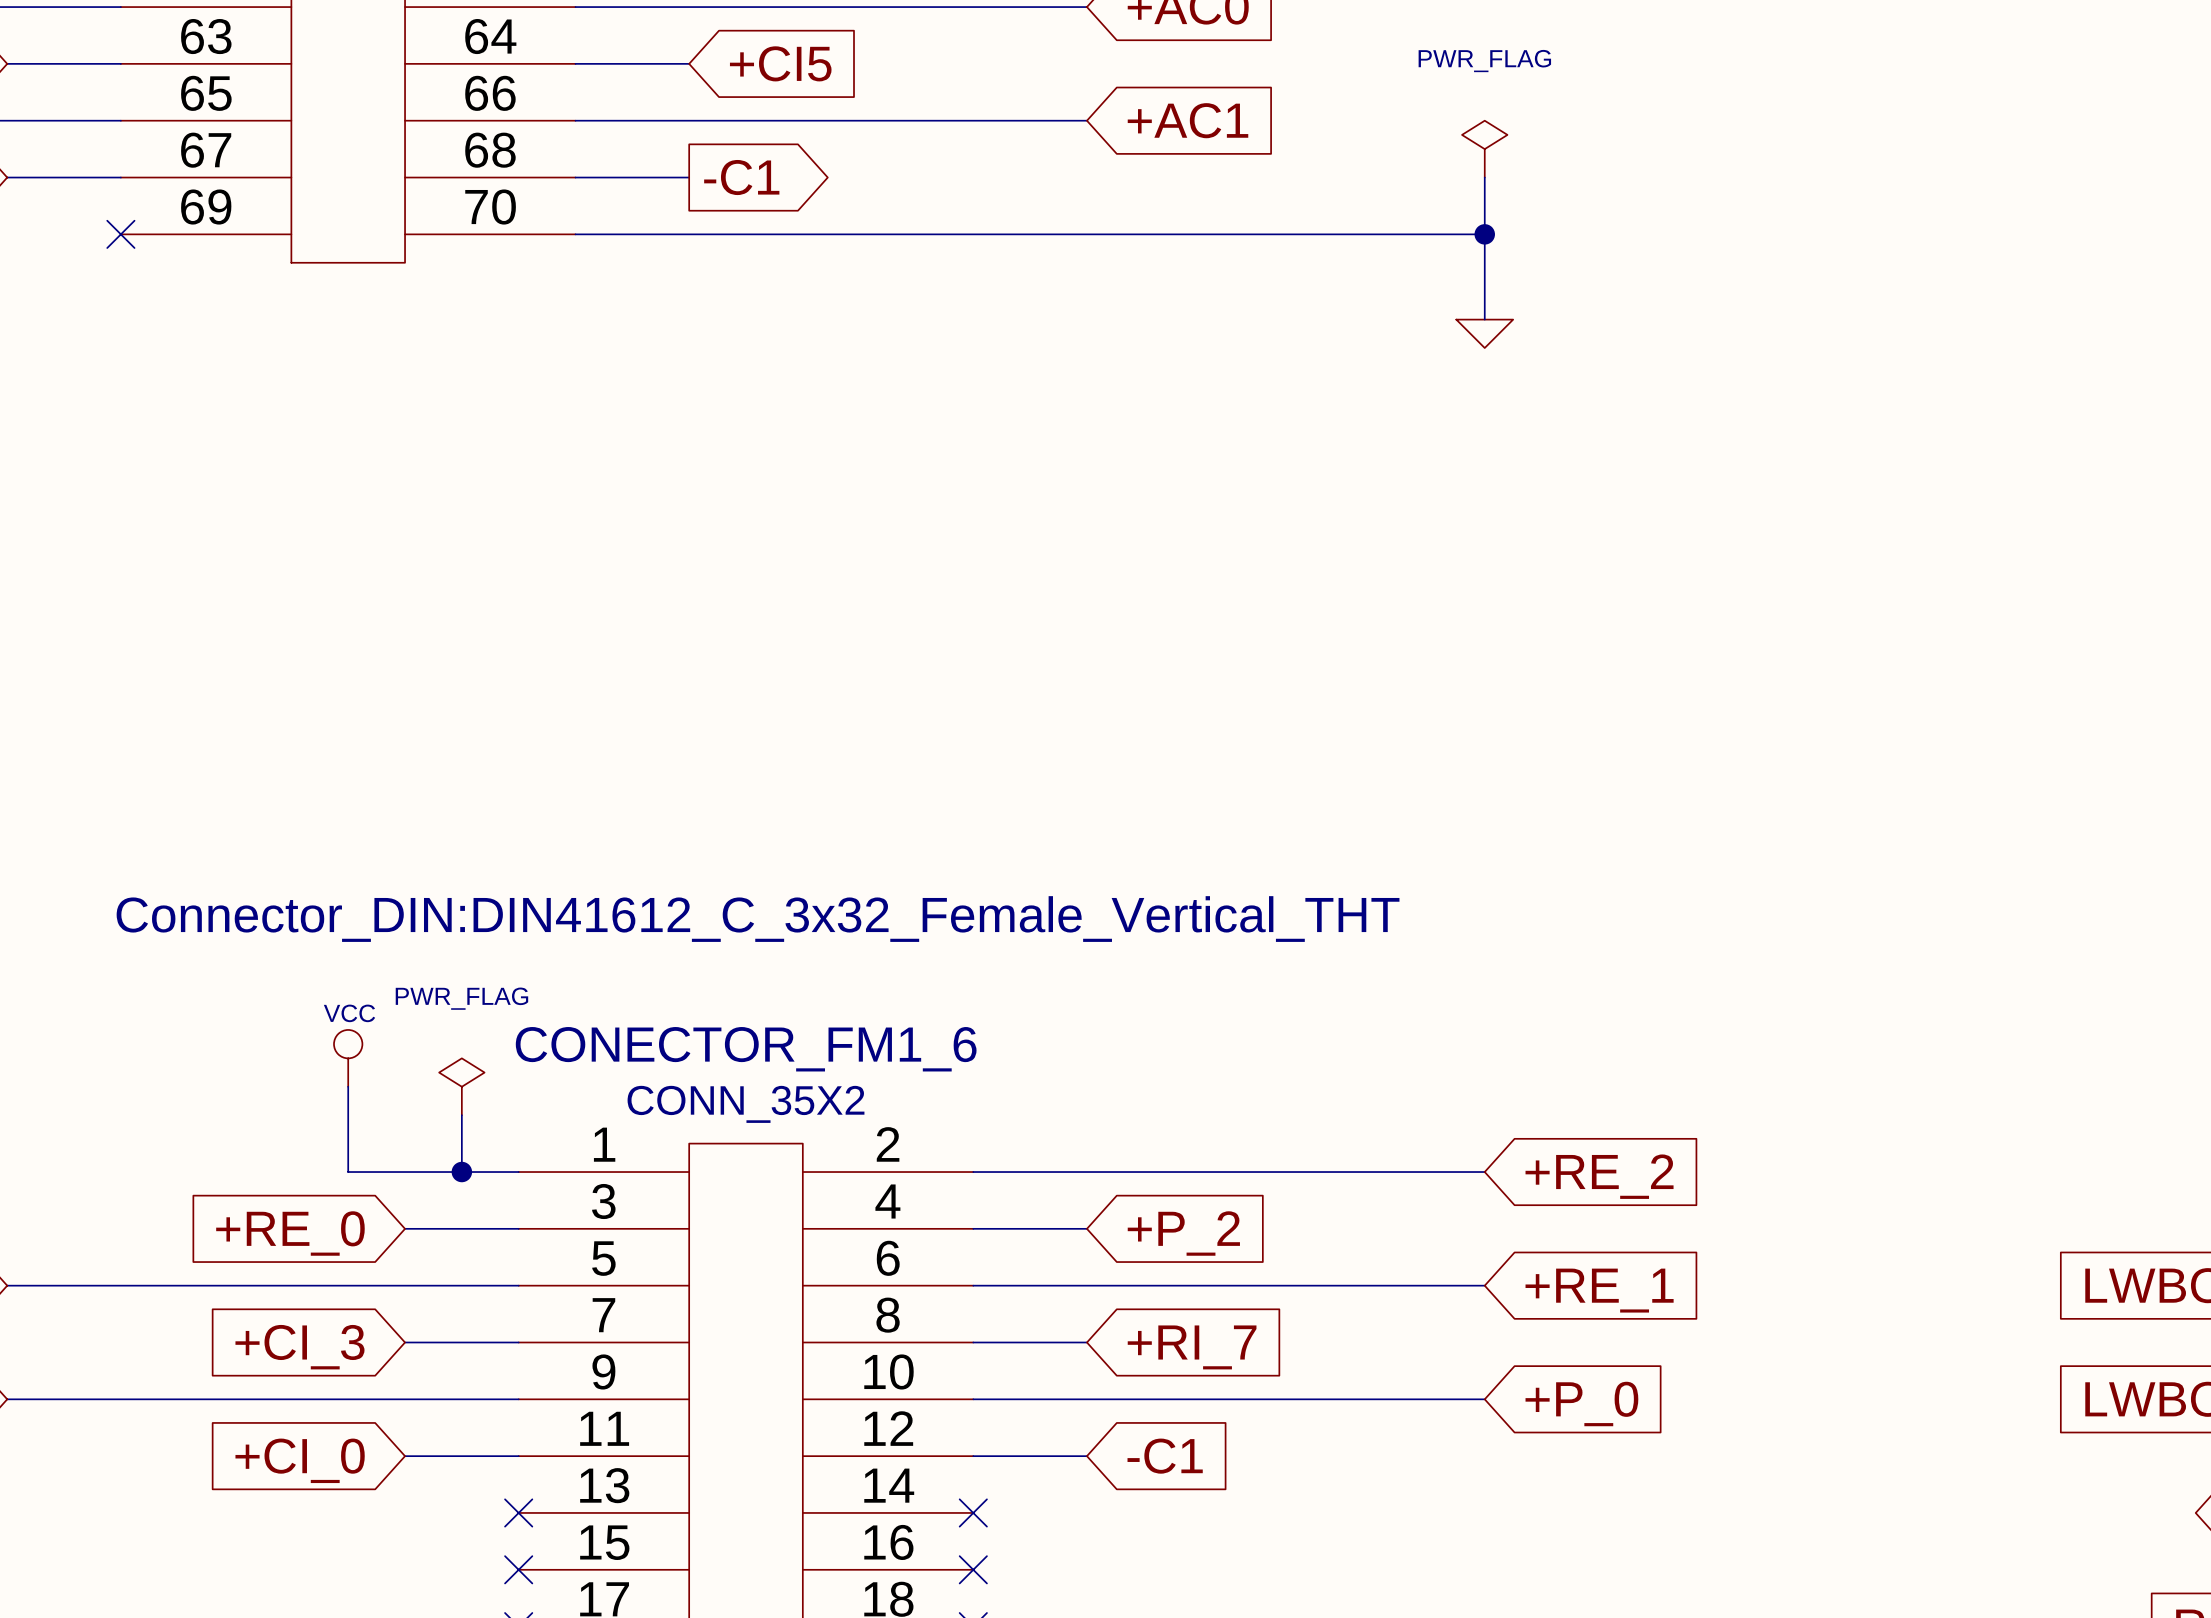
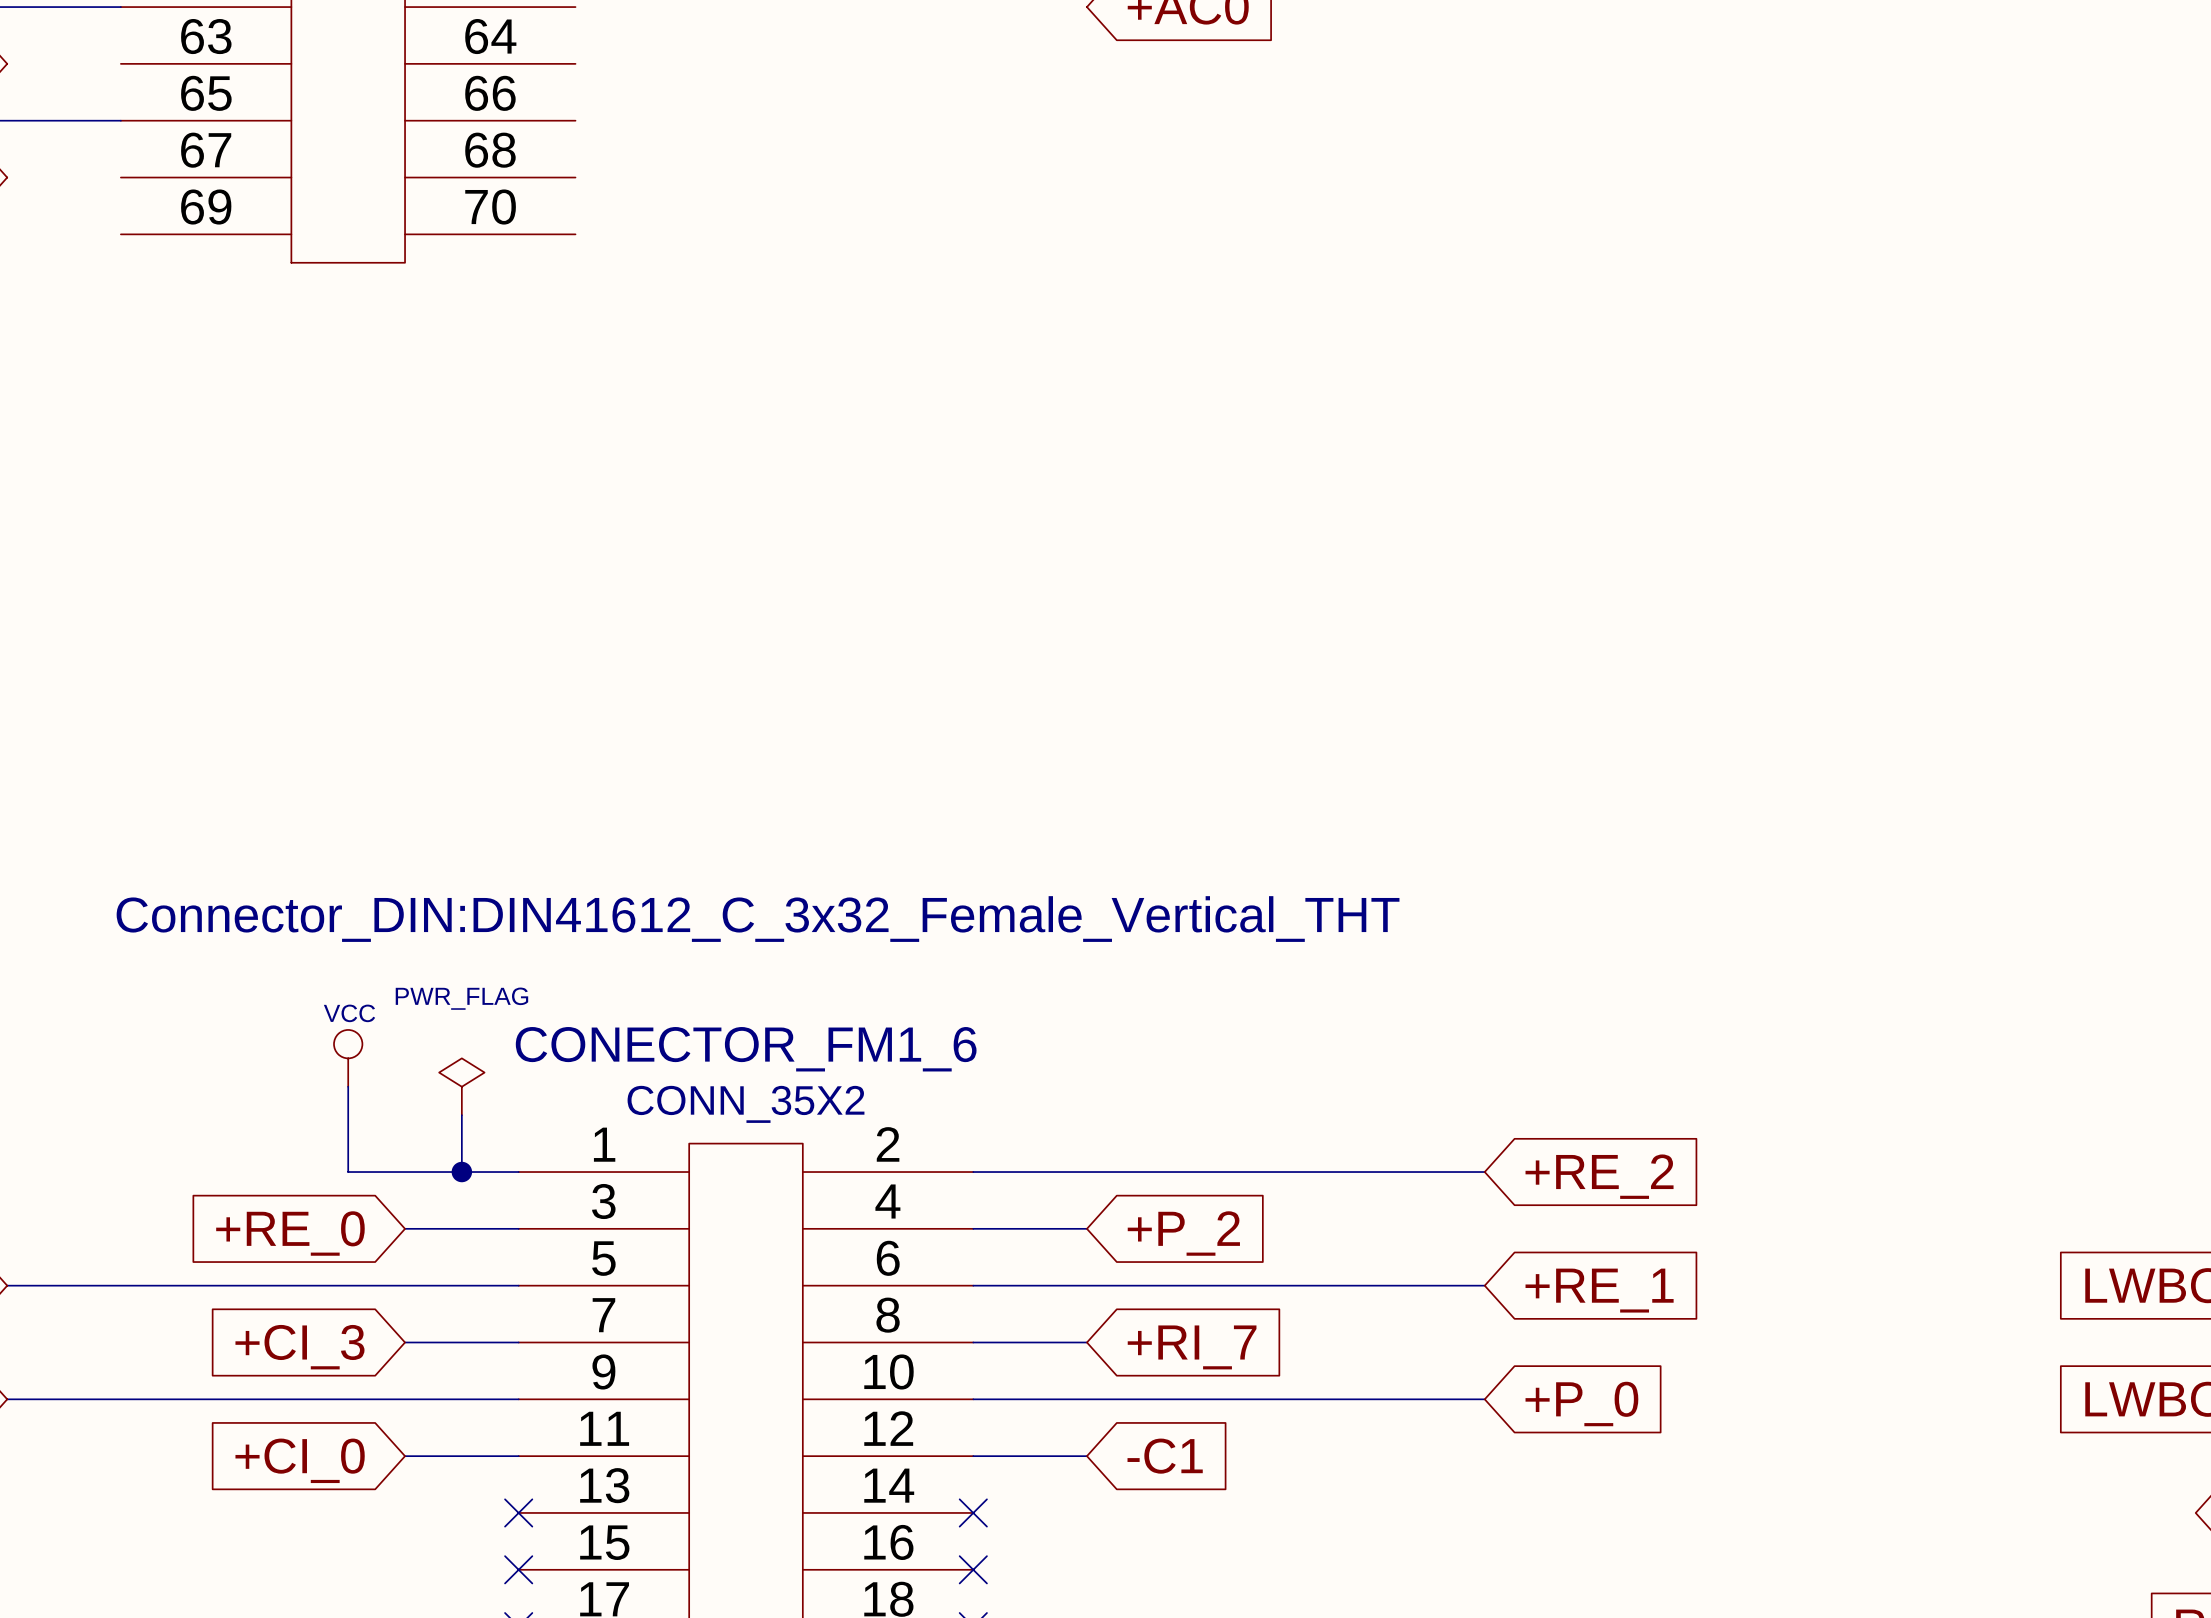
wire: (575, 7) (1086, 7) -> none
wire: (7, 63) (120, 63) -> none
wire: (575, 63) (689, 63) -> none
global label: +CI5 (780, 63) -> none
wire: (575, 120) (1086, 120) -> none
global label: +AC1 (1188, 120) -> none
power symbol: PWR_FLAG (1484, 149) -> none
wire: (7, 177) (120, 177) -> none
wire: (575, 177) (689, 177) -> none
global label: -C1 (741, 177) -> none
wire: (1484, 177) (1484, 319) -> none
no-connect mark: (120, 234) -> none
wire: (575, 234) (1484, 234) -> none
junction: (1484, 234) -> none
power symbol: (1484, 333) -> none

